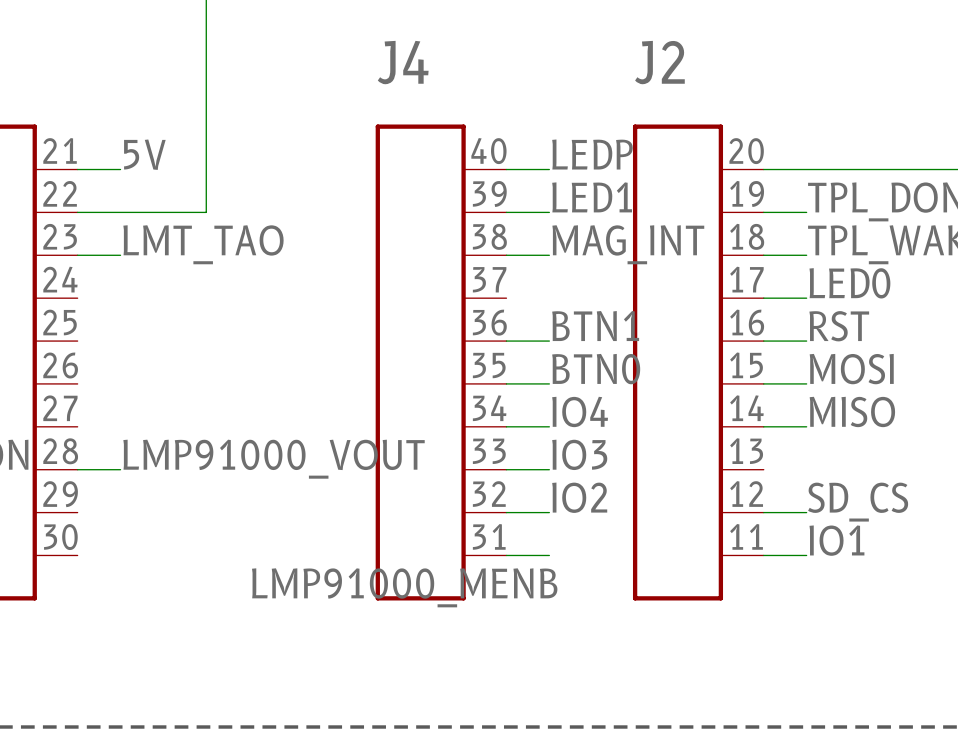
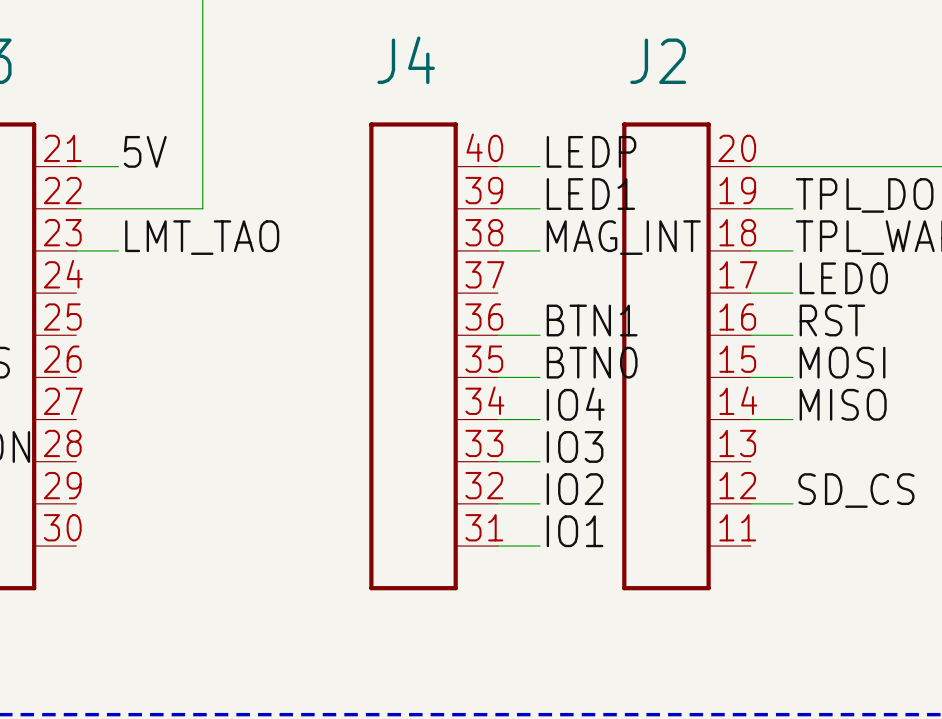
label: LMP91000_VOUT (274, 459) -> none
wire: (77, 469) (120, 469) -> none
label position: IO1 (836, 540) -> IO1 (575, 531)
wire: (763, 555) (806, 555) -> none
label: LMP91000_MENB (404, 587) -> none

